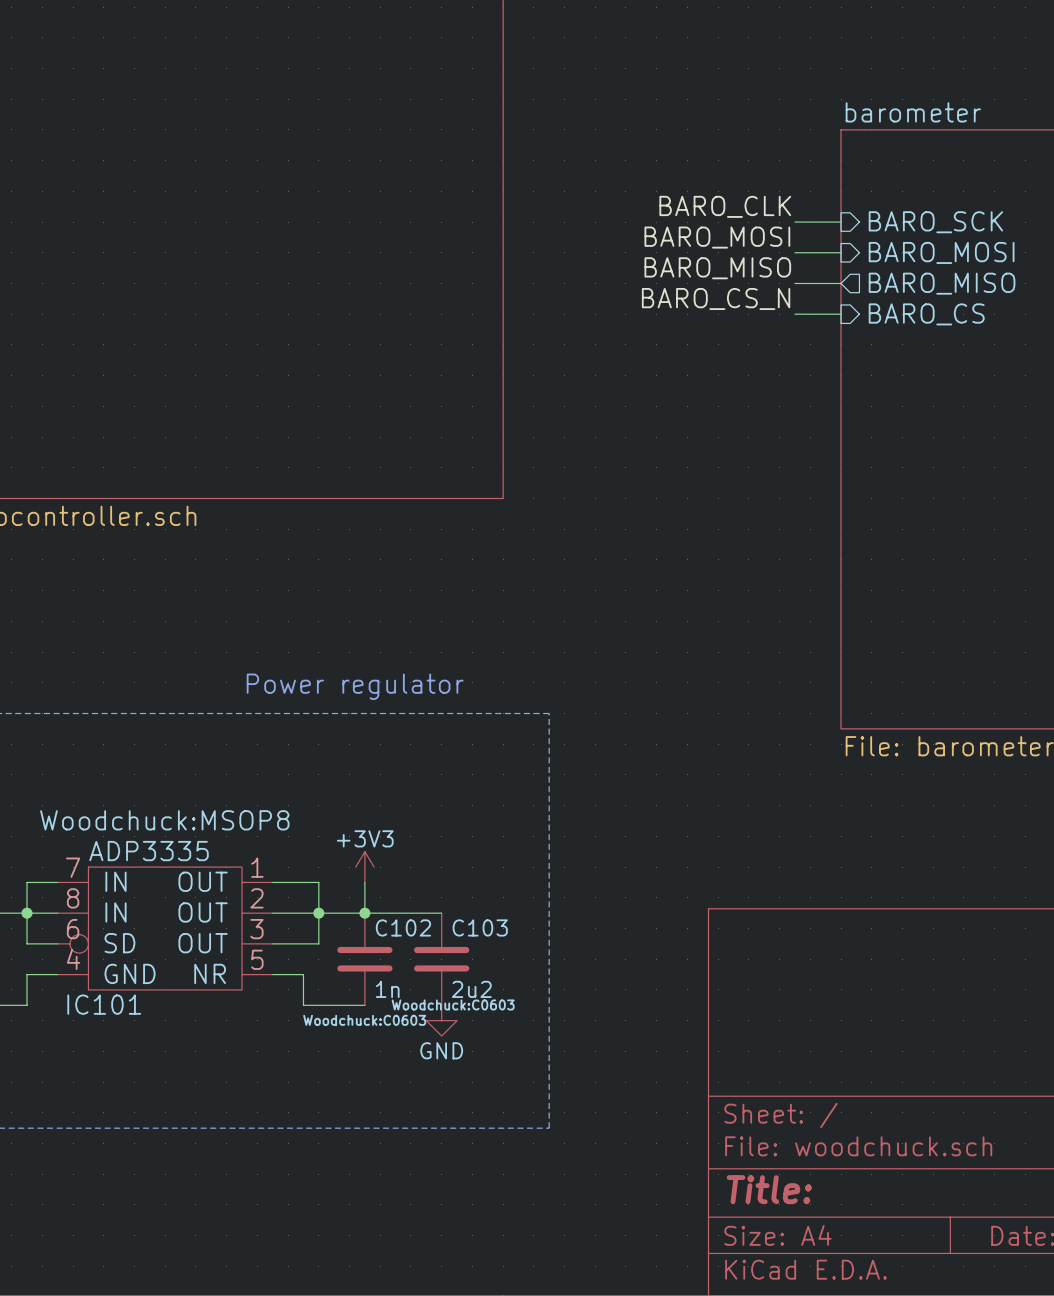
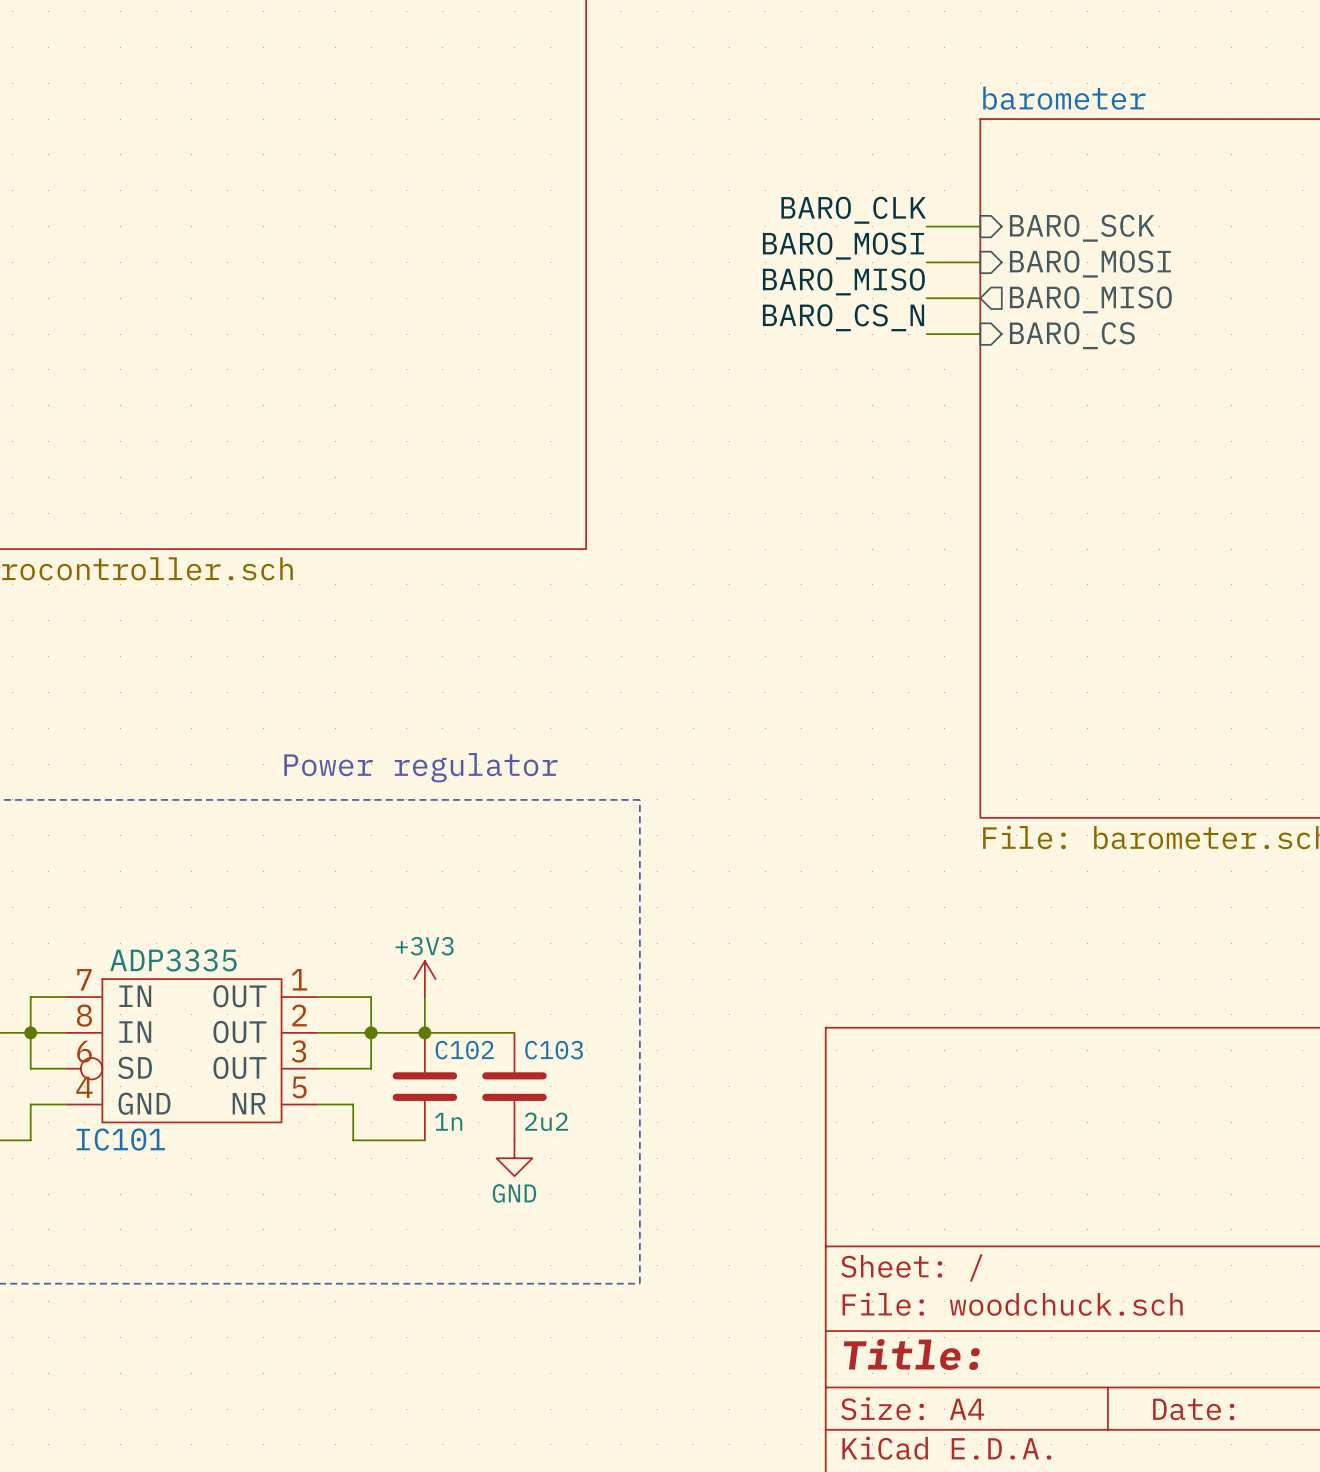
IC101 text: Woodchuck:MSOP8 (164, 820) -> none
C103 text: Woodchuck:C0603 (453, 1004) -> none
C102 text: Woodchuck:C0603 (364, 1020) -> none

